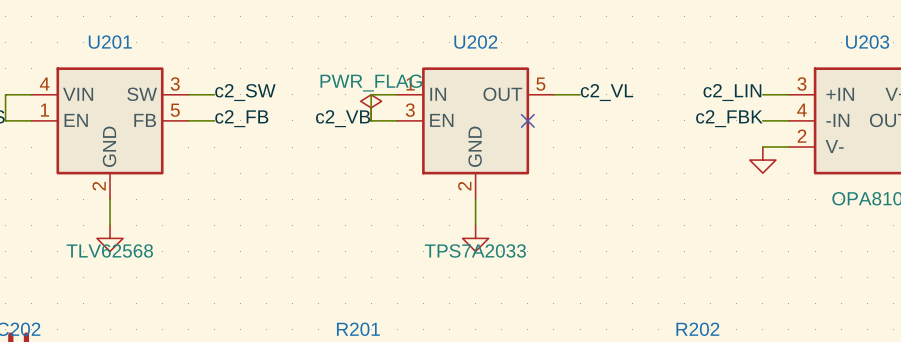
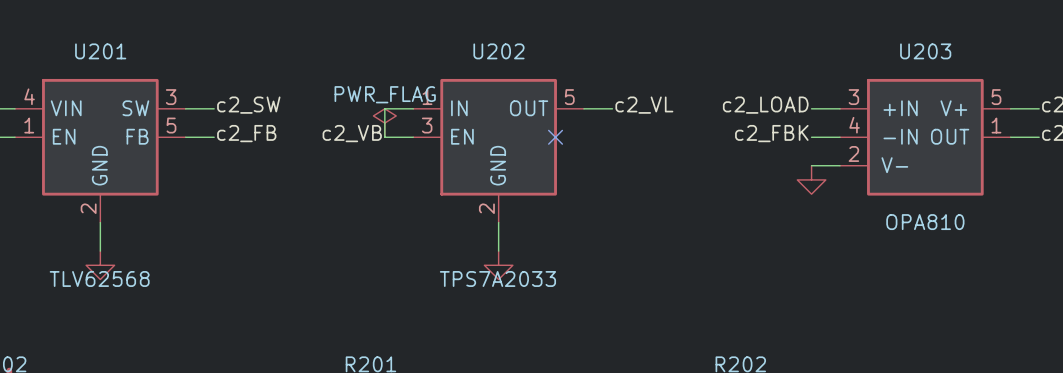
label: c2_LIN (732, 92) -> c2_LOAD (765, 105)

